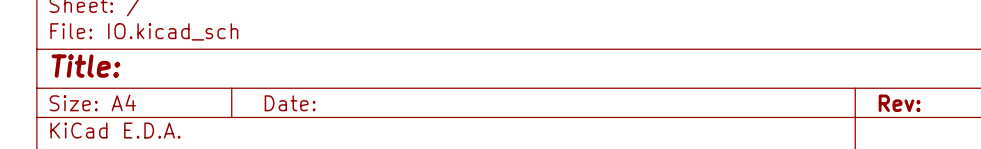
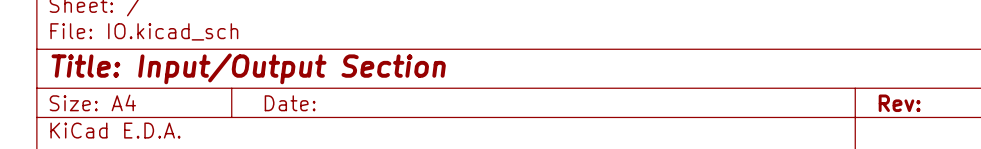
title block: Title: (85, 66) -> Title: Input/Output Section (248, 68)

